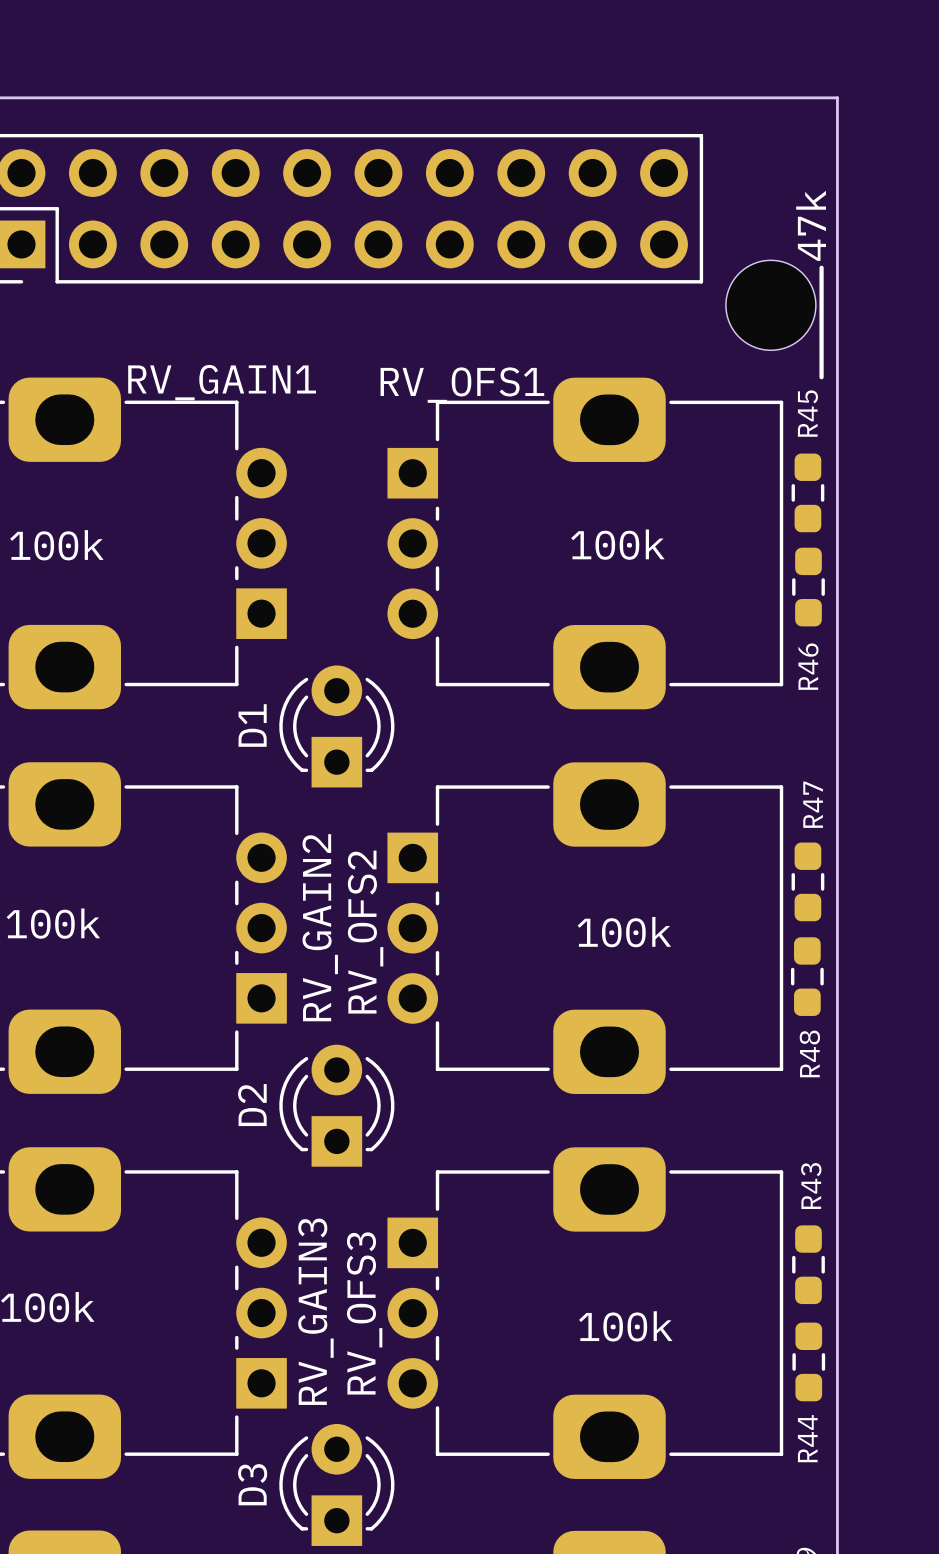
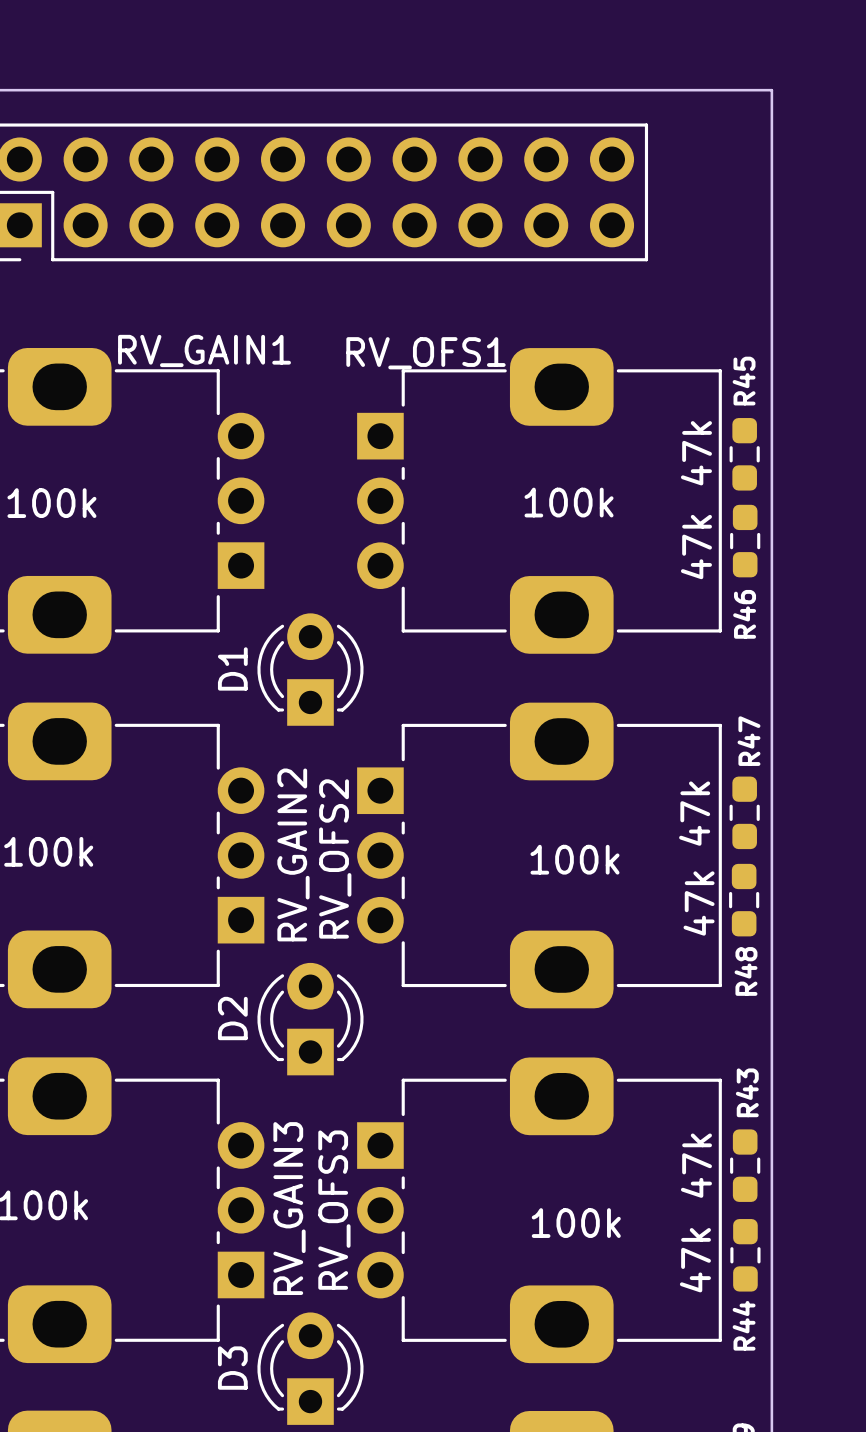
text: 47k (811, 225) -> none
line: (821, 267) (821, 377) -> none
part: (770, 305) -> none
R45 value: none -> 47k (696, 453)
R46 value: none -> 47k (696, 547)
R47 value: none -> 47k (694, 813)
R48 value: none -> 47k (699, 903)
R43 value: none -> 47k (696, 1165)
R44 value: none -> 47k (695, 1260)

